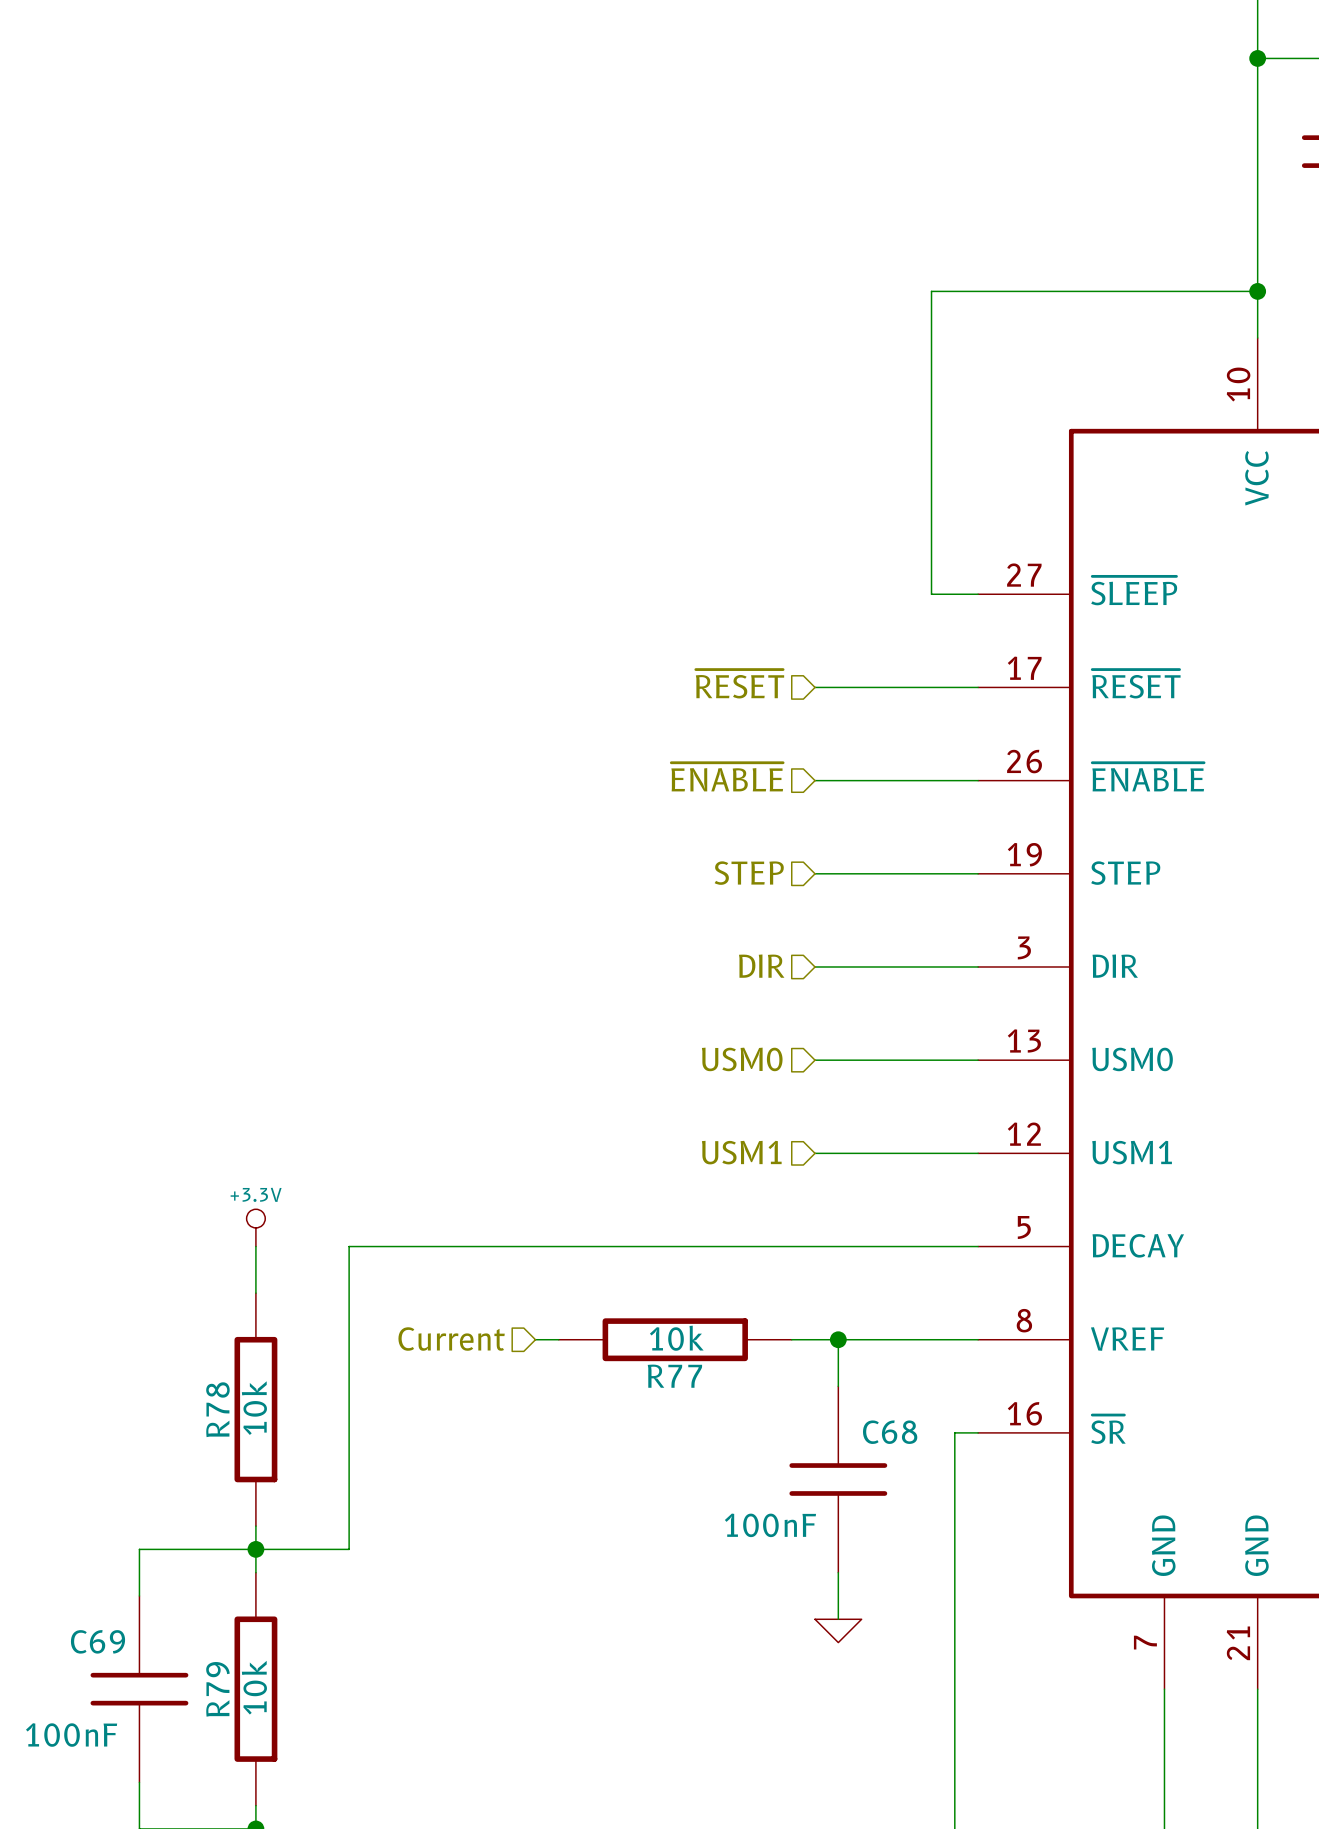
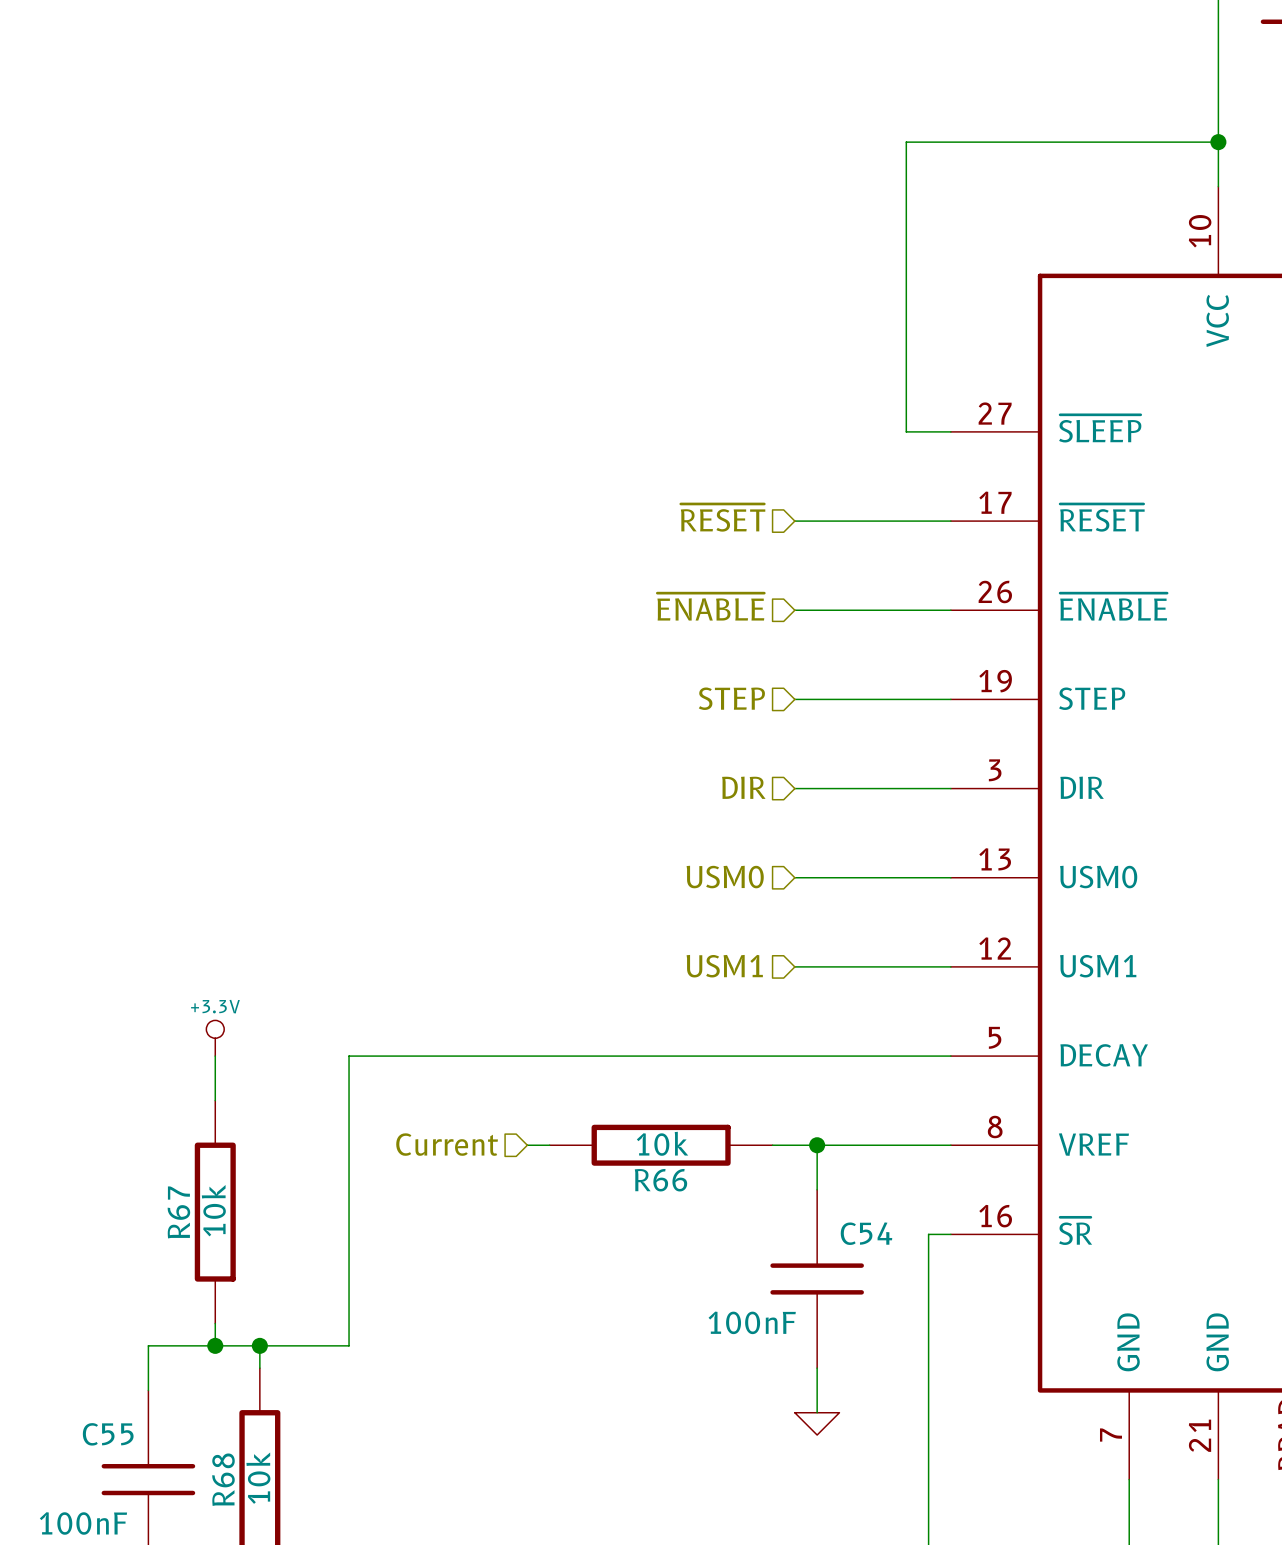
power symbol position: +3.3V (255, 1227) -> +3.3V (215, 1038)
wire: (255, 1246) (255, 1293) -> (215, 1056) (215, 1100)
R77 name: R77 (674, 1376) -> R66 (660, 1180)
R67: none -> 10k (215, 1212)
R78: 10k (255, 1409) -> none
C68 name: C68 (890, 1432) -> C54 (866, 1233)
wire: (255, 1526) (255, 1549) -> (215, 1323) (215, 1345)
junction: none -> (215, 1345)
C69 name: C69 (98, 1641) -> C55 (108, 1434)
R79 name: R79 (217, 1689) -> R68 (223, 1479)

